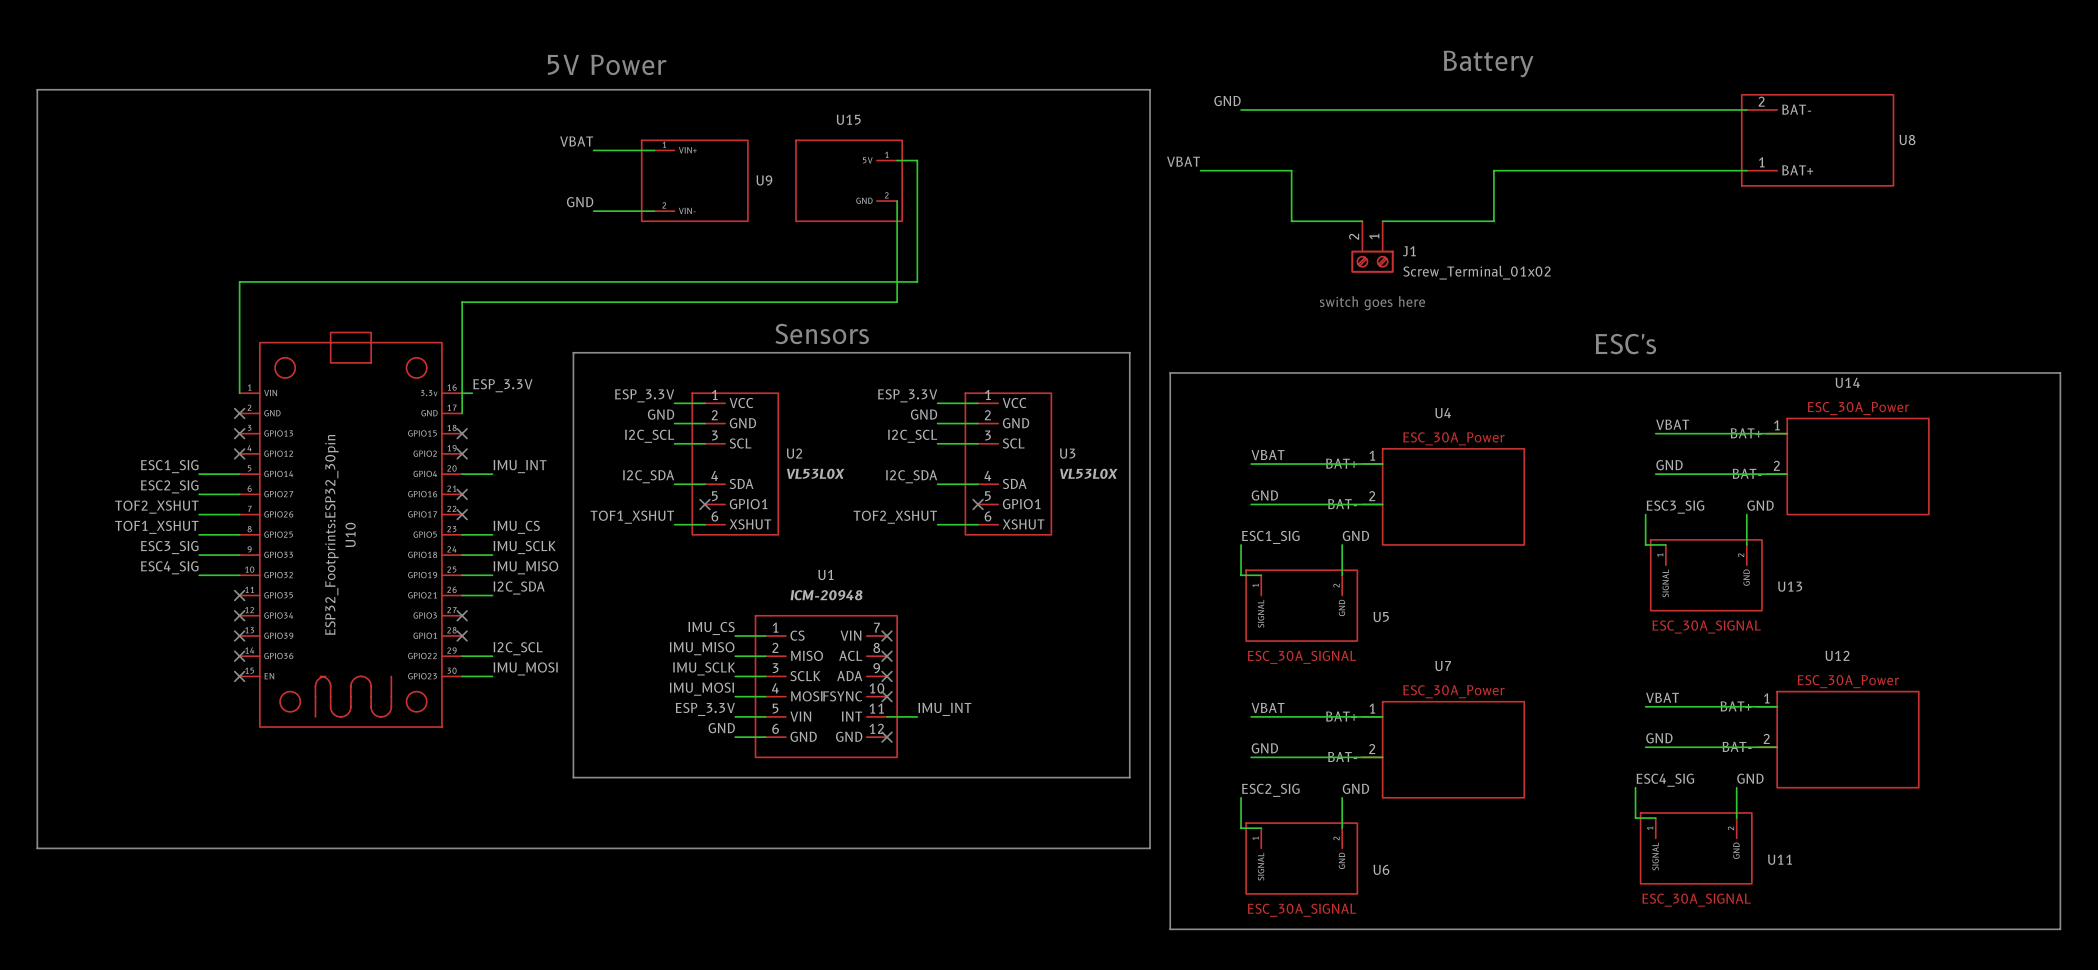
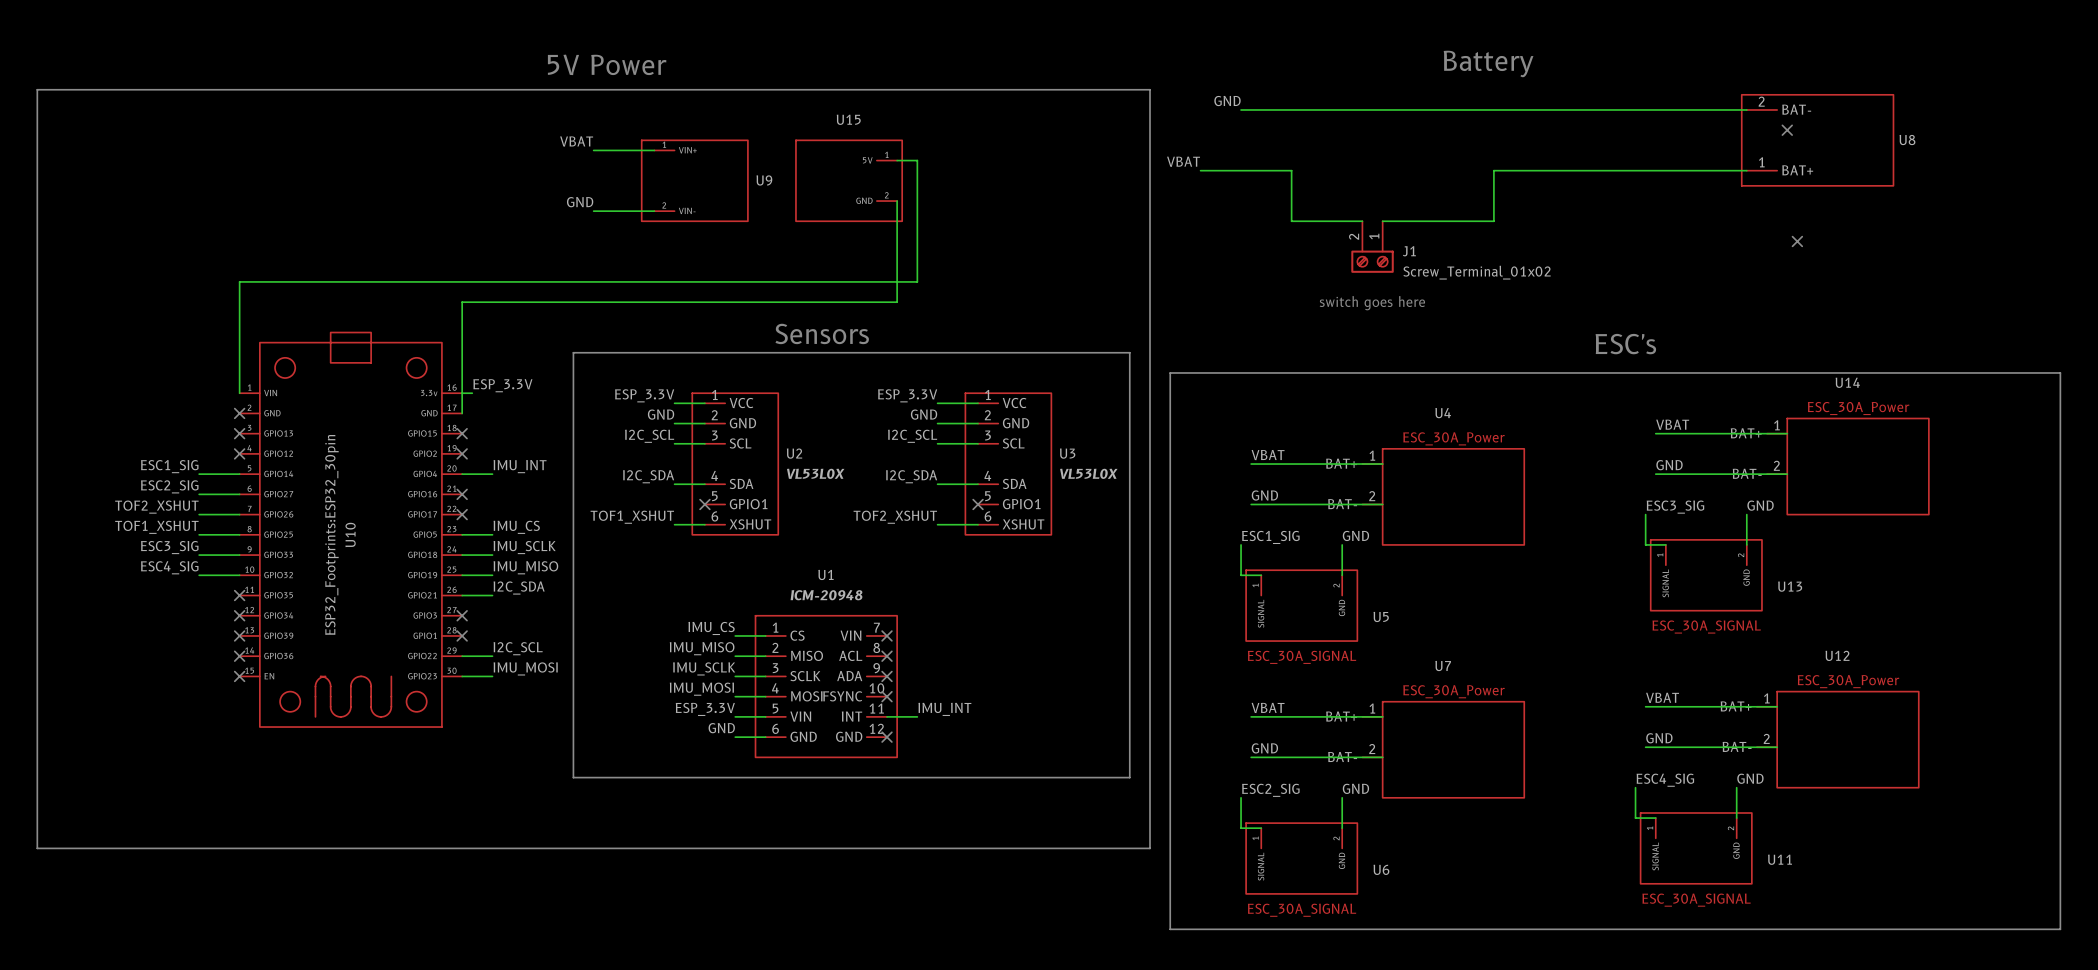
no-connect mark: none -> (1787, 130)
no-connect mark: none -> (1797, 241)

